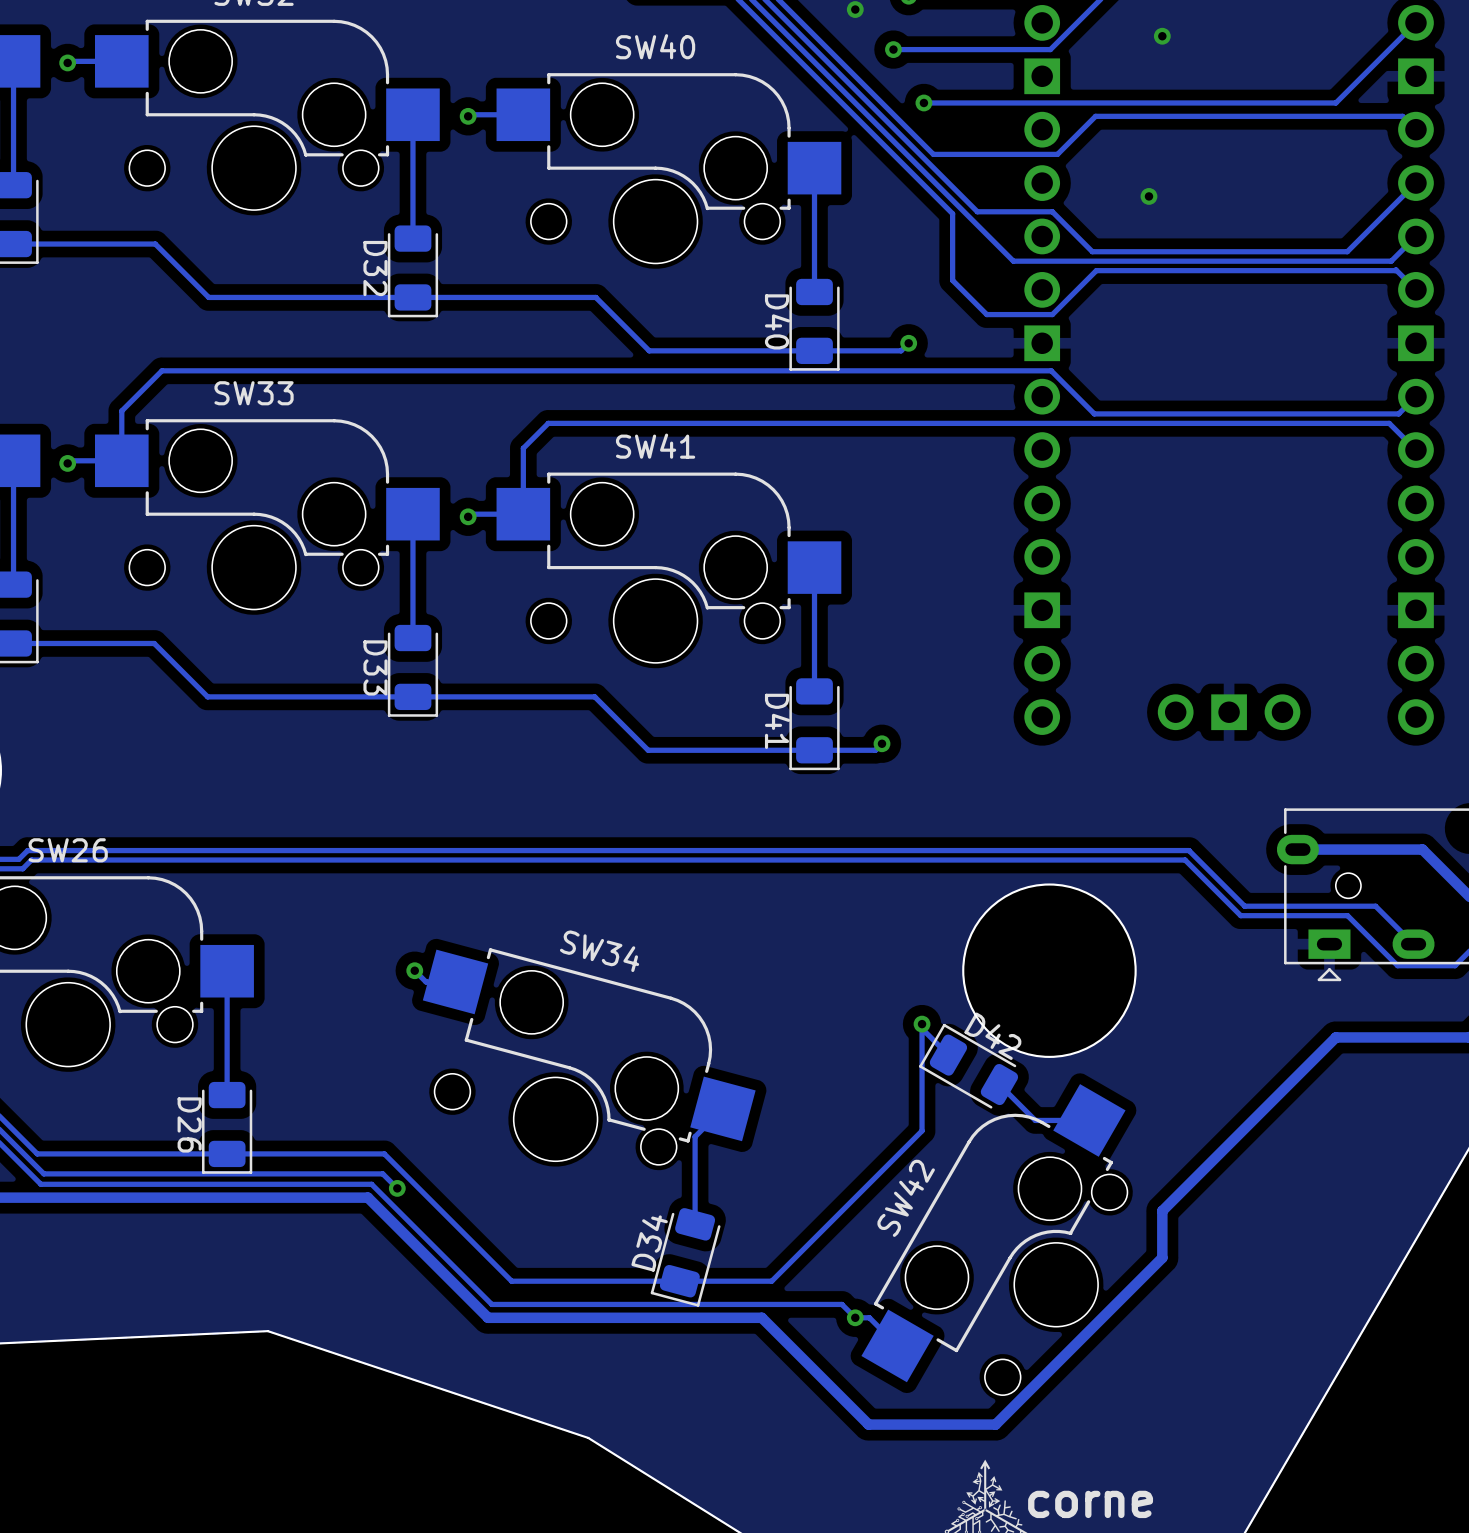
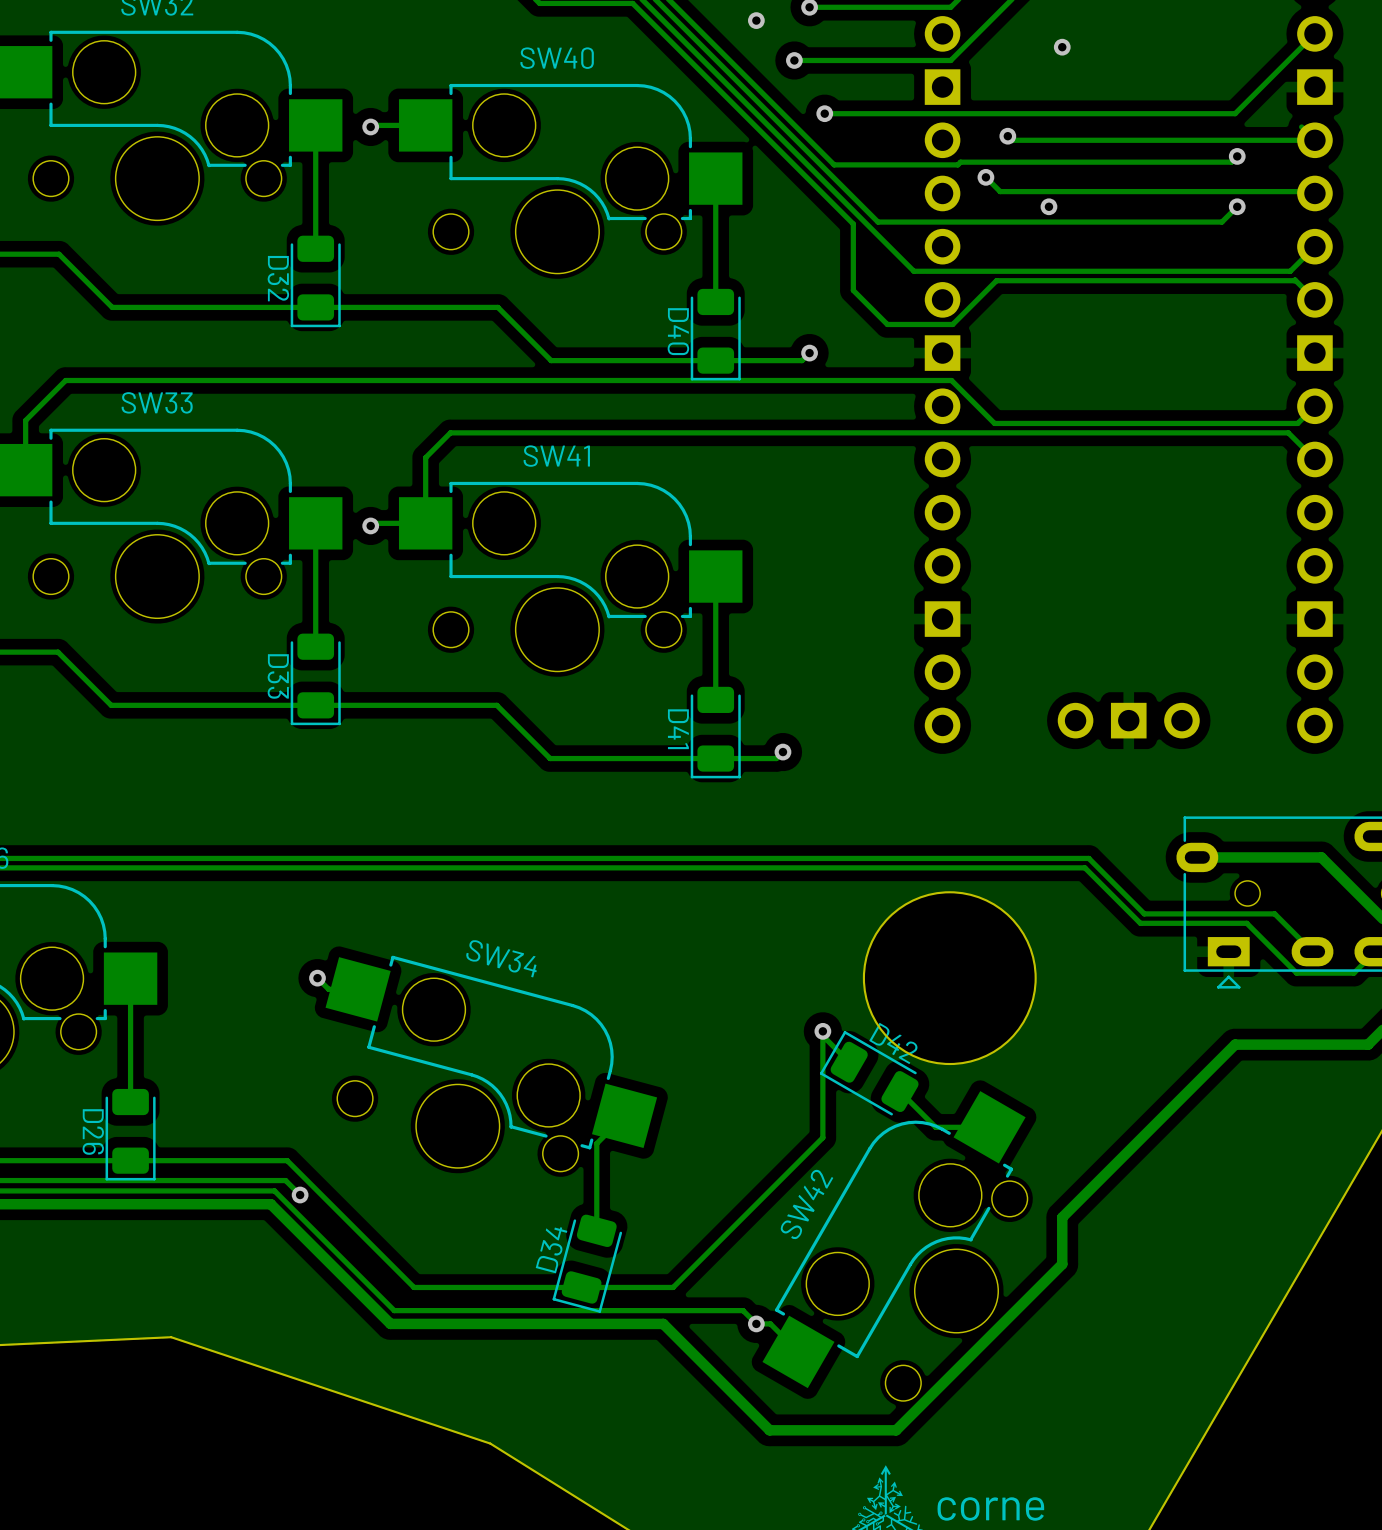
track: (1402, 116) (1095, 116) (1060, 151) -> (1237, 156) (1231, 162) (960, 162)
track: none -> (1007, 136) (1011, 140) (1314, 140)
via: none -> (1007, 136)
via: none -> (1237, 156)
via: none -> (985, 177)
track: (1415, 183) (1347, 251) (1092, 251) (1052, 211) -> (1314, 193) (1313, 191) (1000, 191) (985, 177)
track: none -> (1237, 206) (1221, 222) (952, 222)
via: none -> (1237, 206)

